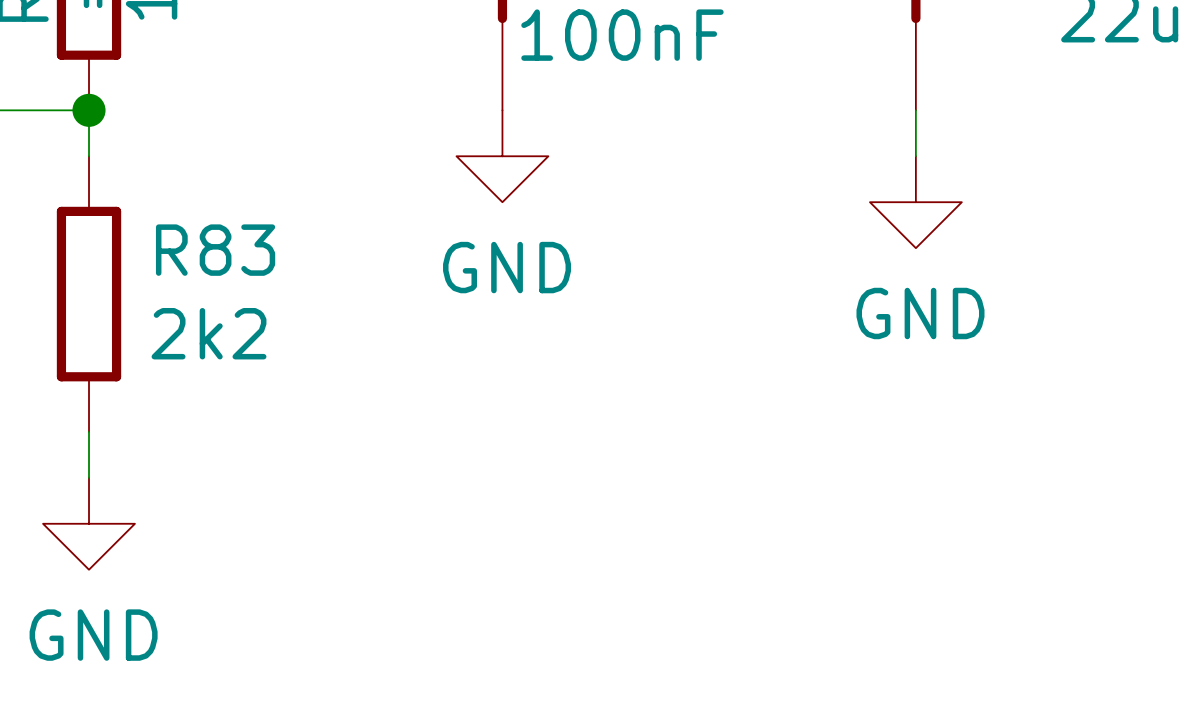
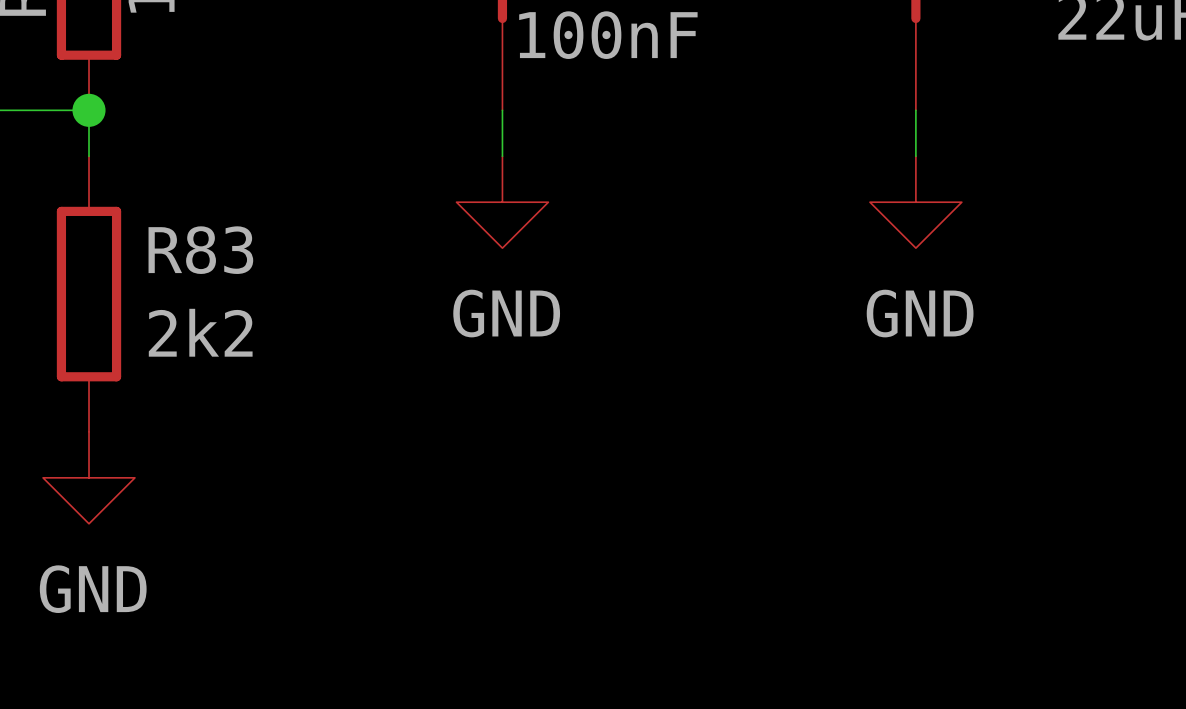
power symbol position: GND (502, 156) -> GND (502, 202)
power symbol position: GND (89, 523) -> GND (89, 477)

